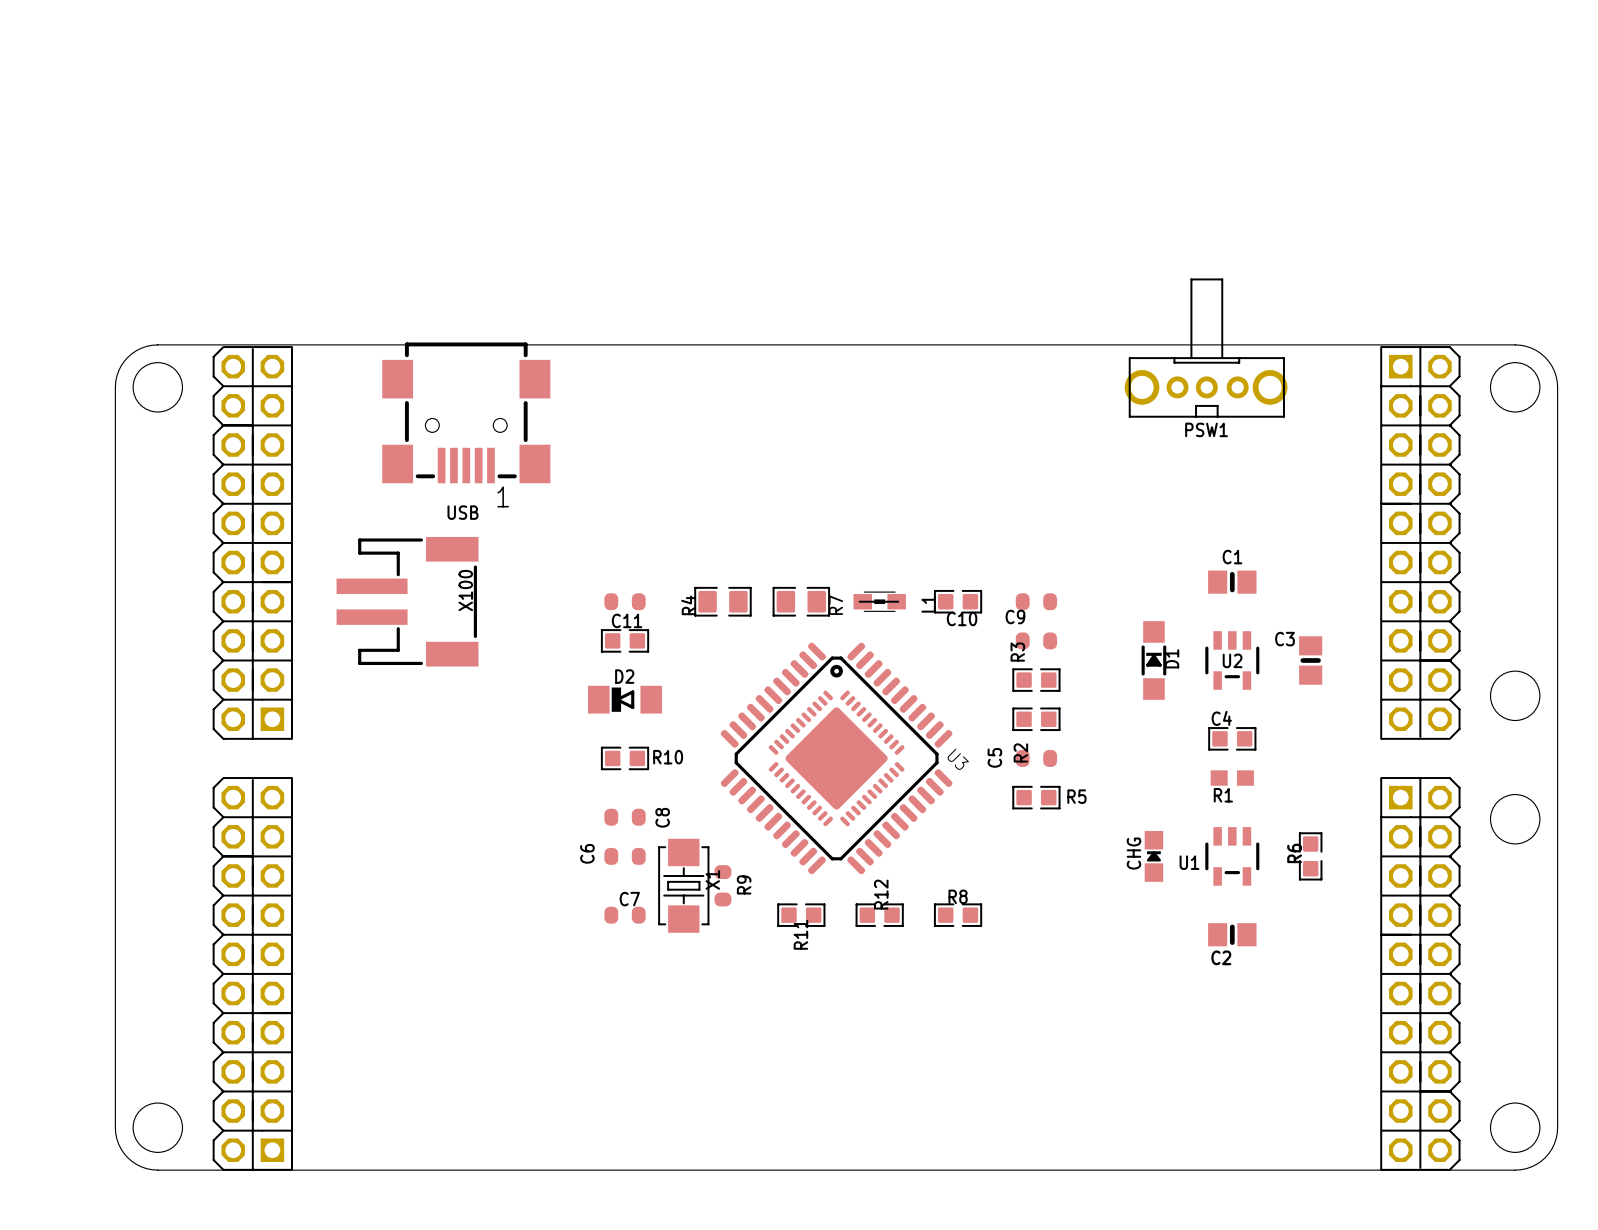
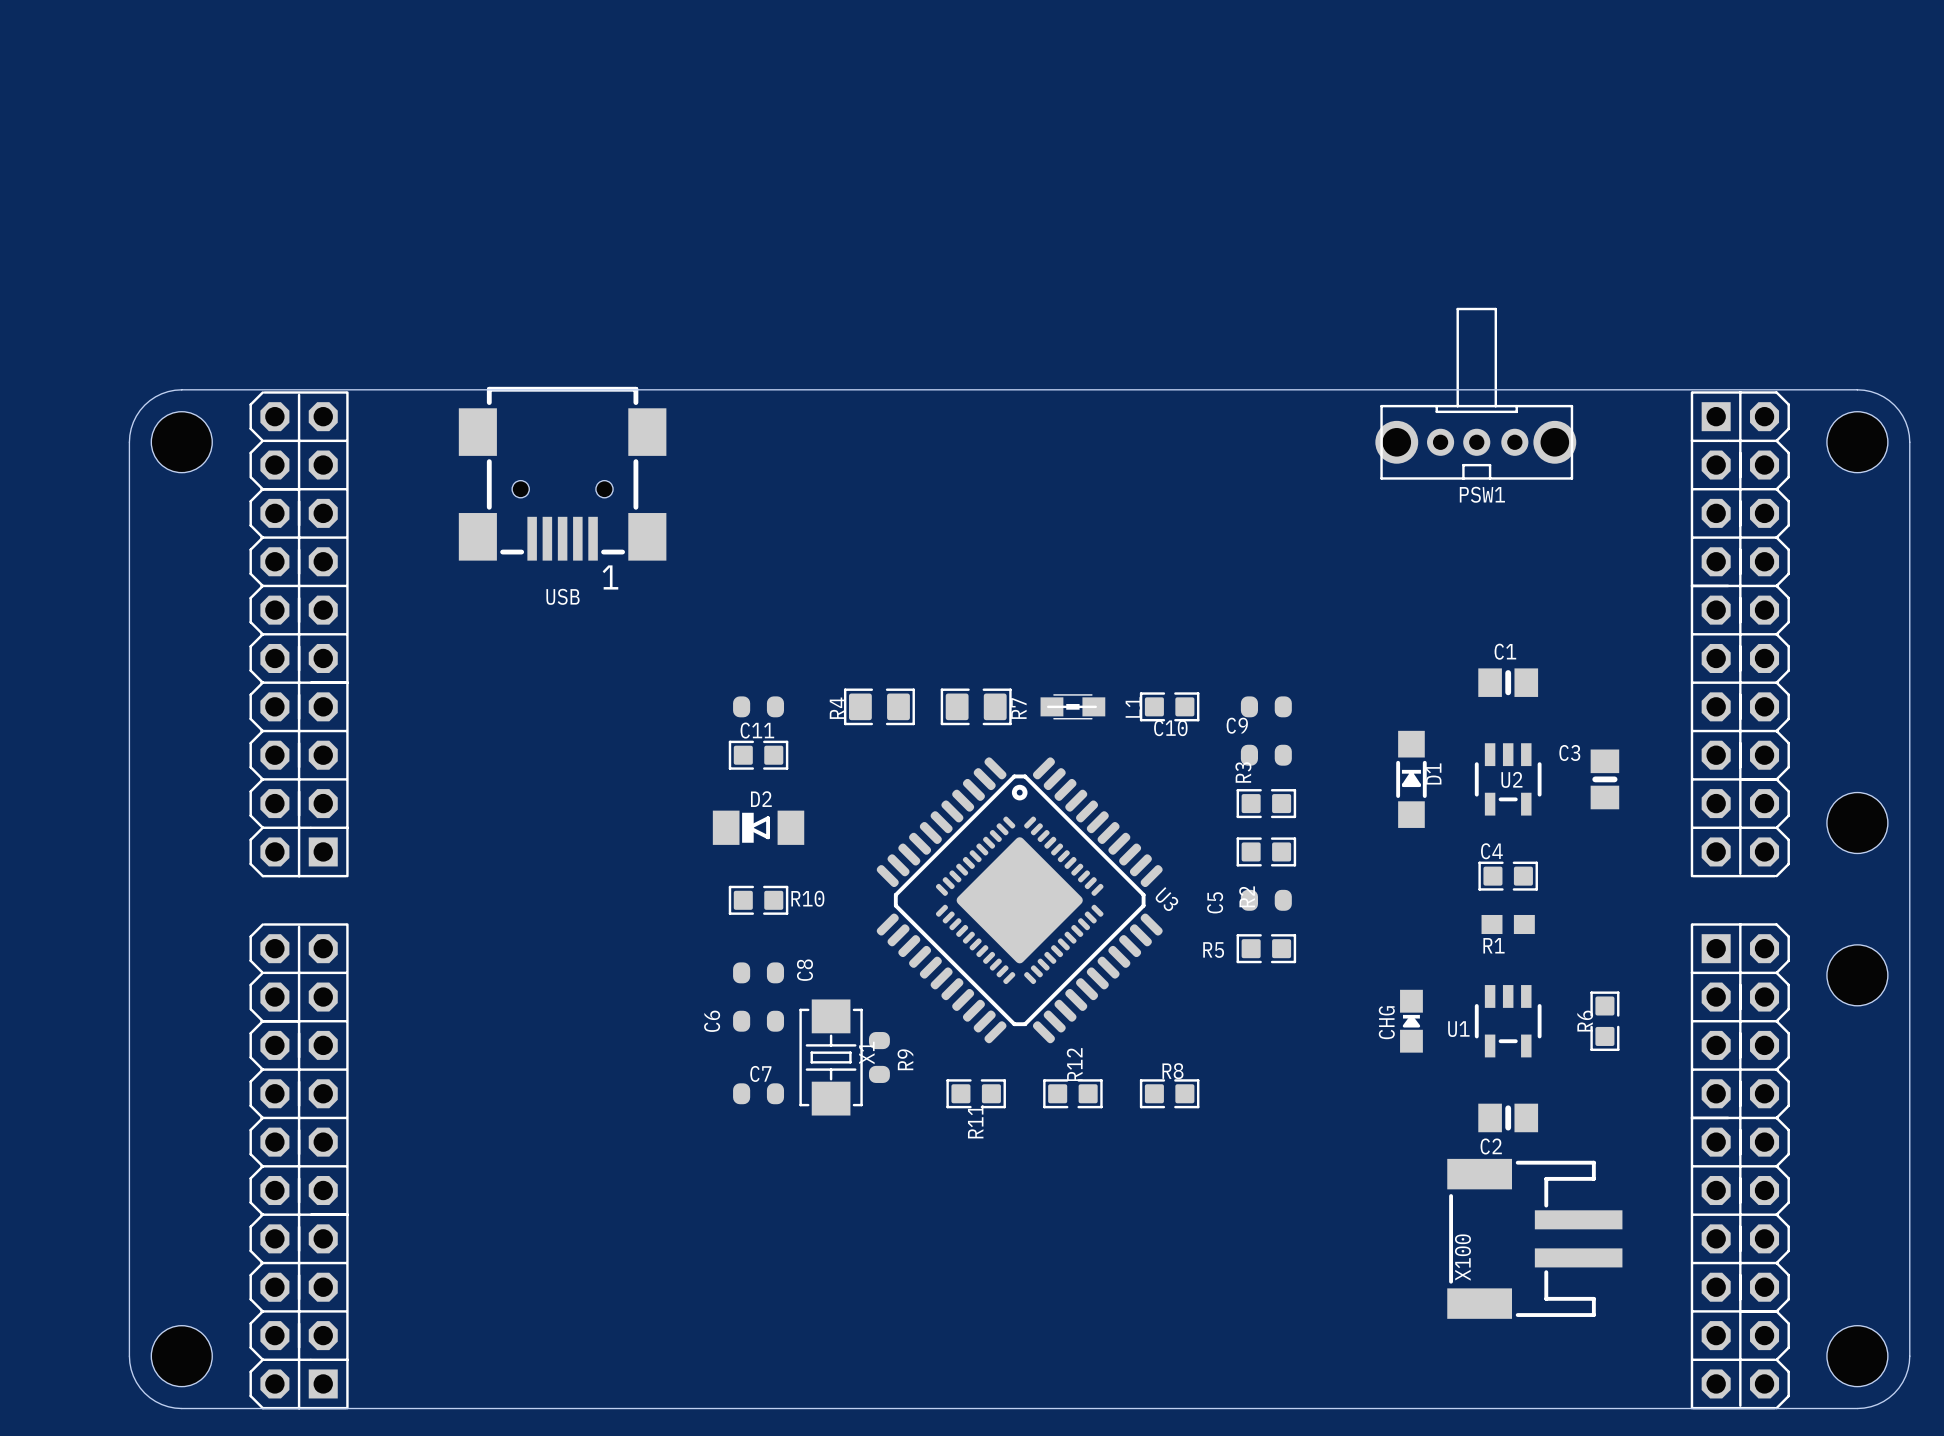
X100 rotation: 0° (407, 601) -> 180° (1534, 1238)
X100 position: (407, 601) -> (1534, 1238)
R5 name position: R5 (1076, 796) -> R5 (1213, 950)

